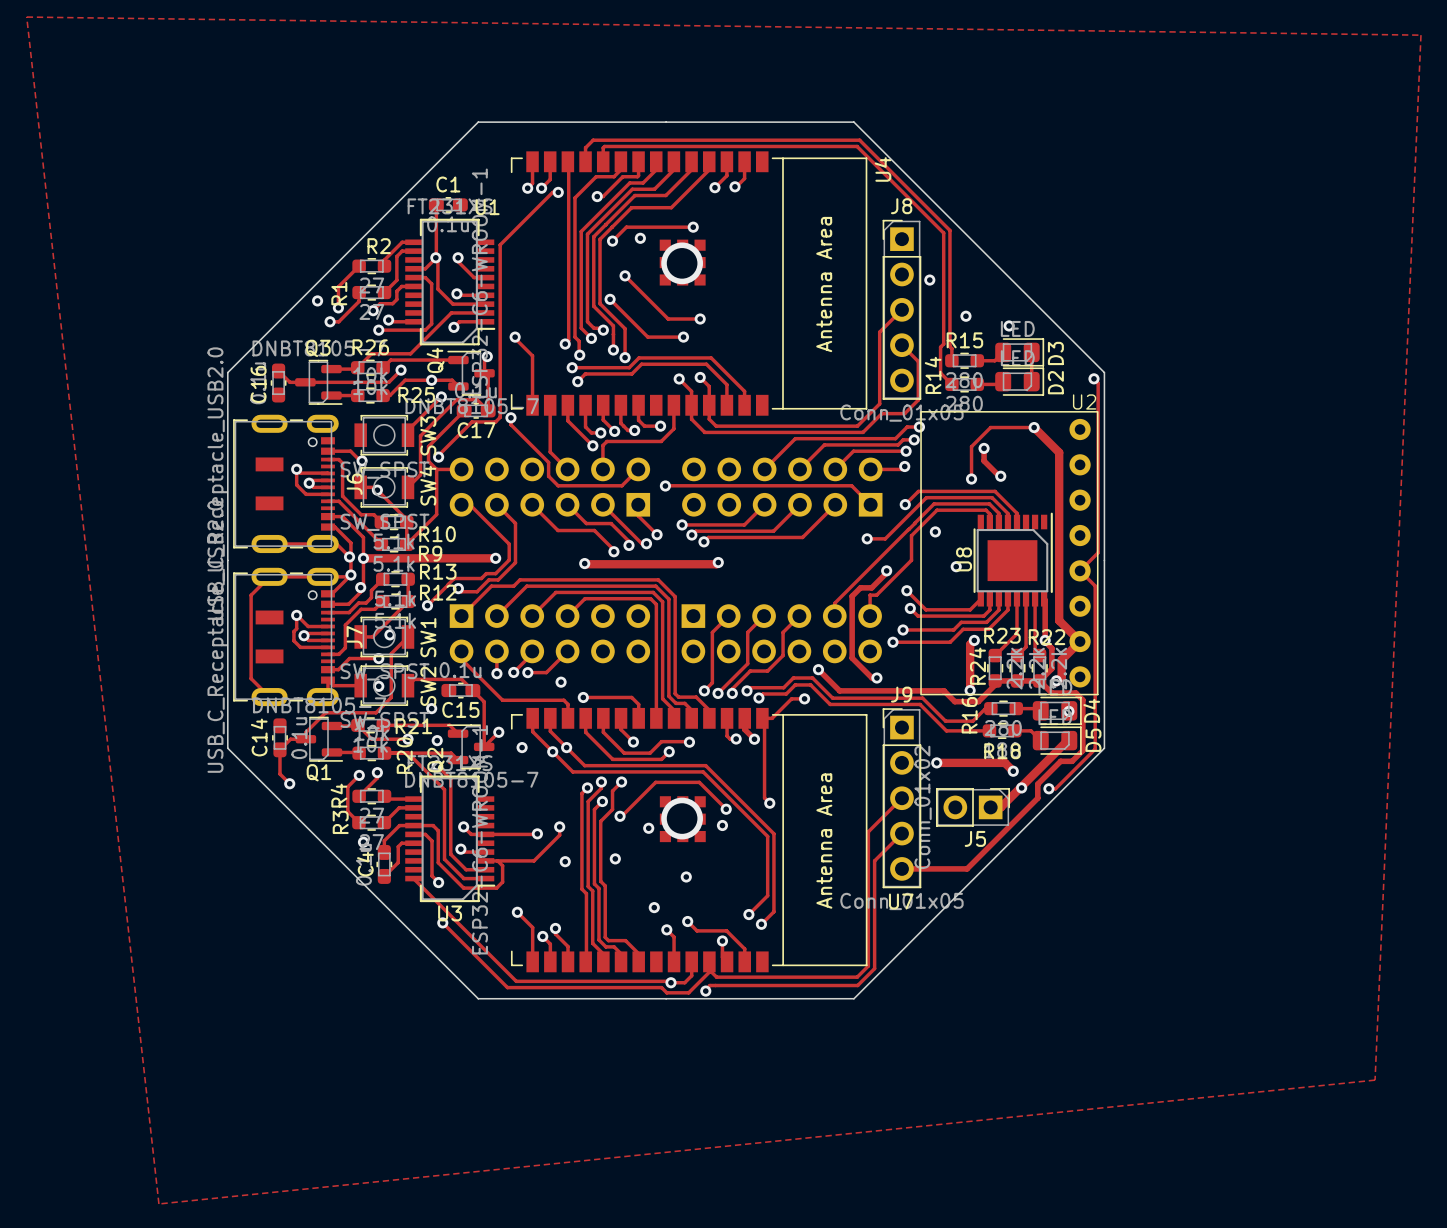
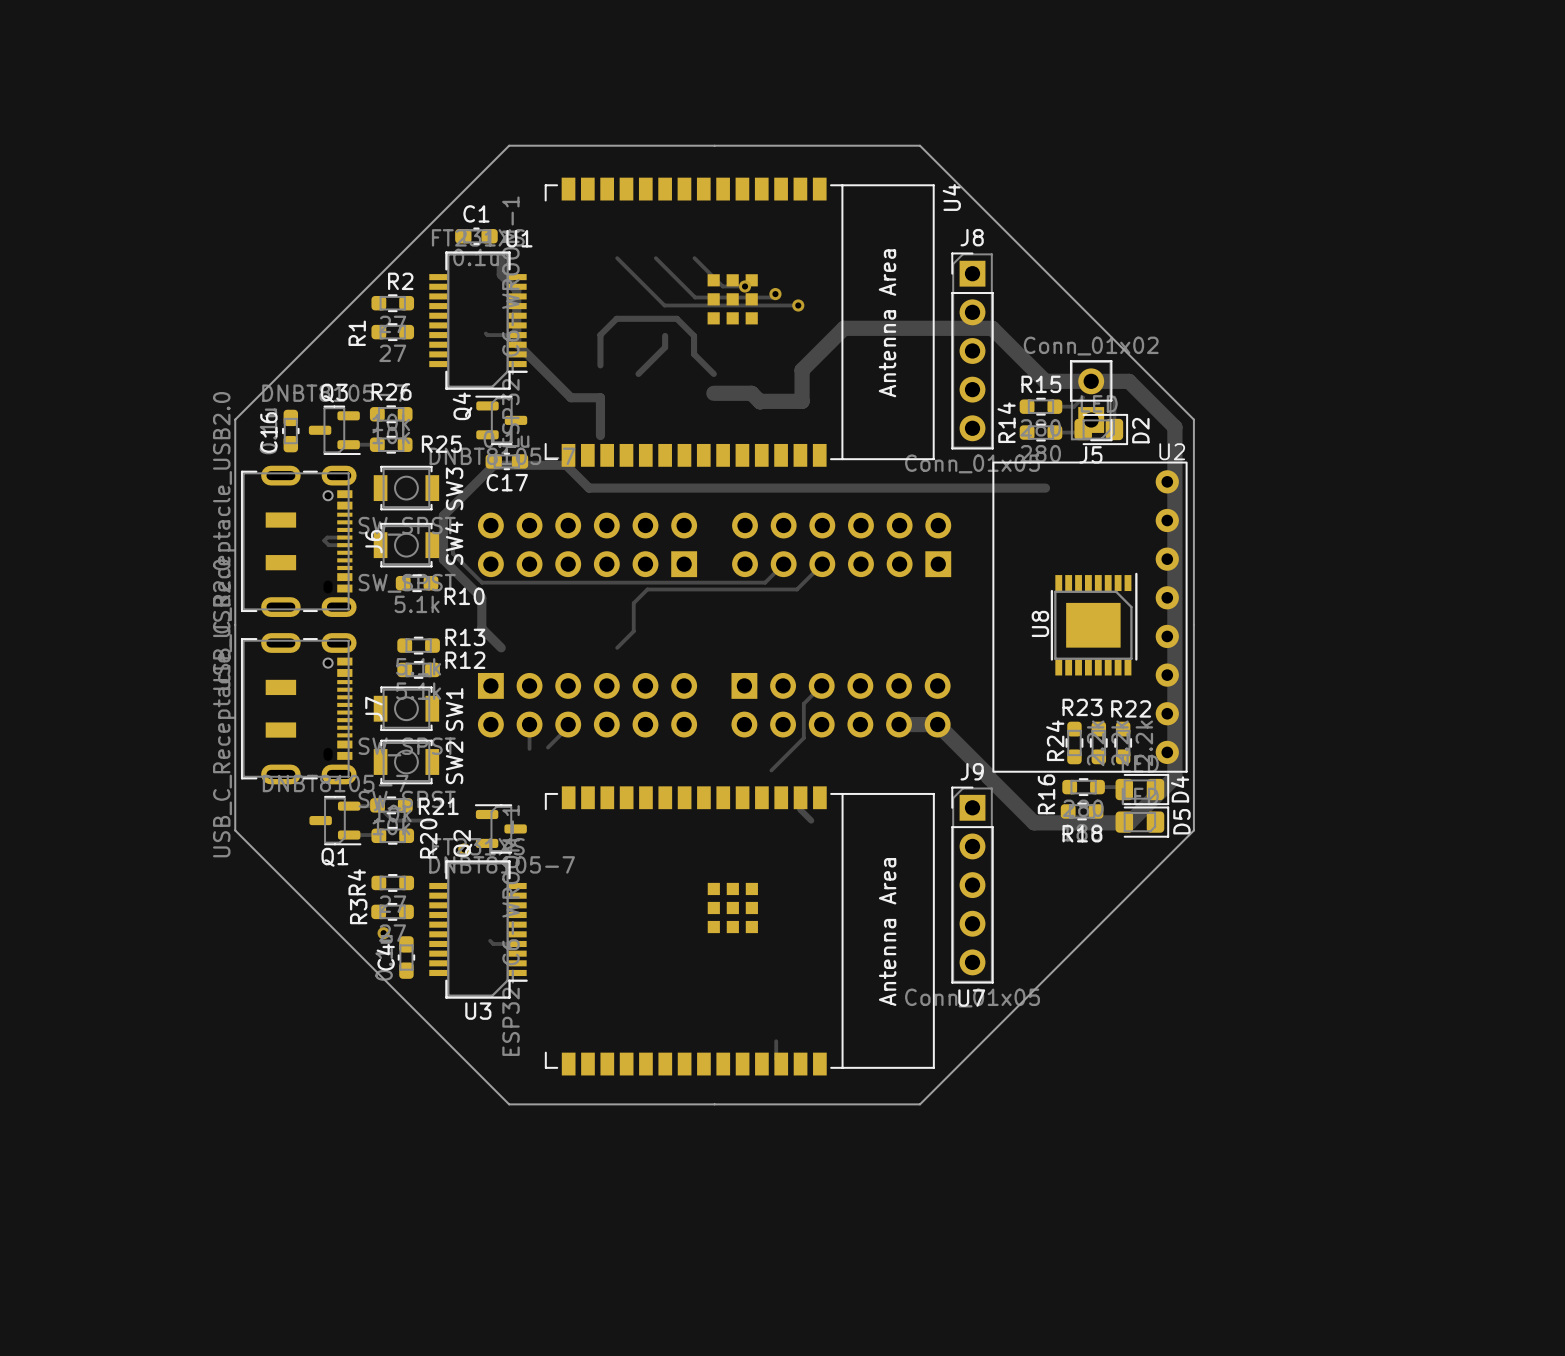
zone outline: (26, 17) (1420, 35) (1375, 1080) (158, 1203) (26, 17) -> none
track: (532, 161) (532, 183) (527, 188) -> none
track: (550, 161) (550, 179) (541, 188) -> none
track: (567, 161) (568, 340) (565, 344) -> none
track: (585, 161) (585, 147) (593, 140) (859, 140) (949, 230) (949, 346) (951, 348) (951, 360) -> none
track: (603, 161) (604, 146) (857, 146) (943, 233) (943, 344) (940, 347) (940, 373) (951, 384) -> none
track: (620, 161) (620, 169) (614, 176) (596, 176) (574, 197) (574, 337) (579, 341) (579, 355) -> none
track: (638, 161) (637, 176) (622, 176) (603, 196) (597, 196) -> none
track: (656, 161) (656, 169) (643, 183) (629, 183) (581, 231) (581, 328) (591, 338) -> none
track: (673, 161) (673, 169) (654, 189) (632, 189) (587, 234) (587, 321) (593, 328) (603, 330) -> none
track: (691, 161) (691, 169) (665, 195) (634, 195) (593, 236) (593, 306) (613, 325) (613, 350) -> none
track: (709, 161) (709, 169) (671, 207) (631, 207) (600, 239) (600, 303) (625, 328) (625, 357) -> none
track: (726, 161) (726, 175) (714, 187) -> none
track: (744, 161) (744, 178) (734, 188) (734, 186) (736, 186) -> none
via: (734, 186) -> none
via: (714, 187) -> none
via: (527, 188) -> none
via: (541, 188) -> none
track: (558, 192) (552, 192) (500, 244) (500, 417) (495, 421) (472, 421) (438, 457) -> none
via: (558, 192) -> none
via: (597, 196) -> none
track: (436, 204) (436, 257) -> none
track: none -> (501, 258) (501, 274) (516, 290) (516, 343) (570, 397) (600, 397) (600, 435)
track: none -> (617, 258) (664, 305) (798, 305)
track: none -> (655, 258) (695, 297) (772, 297) (775, 294)
track: none -> (694, 258) (722, 286) (745, 286)
track: (693, 227) (626, 227) (612, 241) -> none
via: (693, 227) -> none
via: (640, 238) -> none
via: (612, 241) -> none
track: (413, 242) (402, 242) (384, 259) (384, 266) -> none
via: none -> (745, 286)
track: (413, 251) (402, 251) (396, 256) (396, 280) (384, 292) -> none
via: (435, 257) -> none
track: (436, 257) (437, 289) (452, 304) (485, 304) -> none
track: (436, 257) (425, 268) (413, 268) -> none
track: (458, 257) (458, 261) (474, 277) (485, 277) -> none
via: (458, 257) -> none
via: none -> (775, 294)
via: (682, 263) -> none
track: (359, 266) (338, 286) (338, 307) -> none
via: none -> (798, 305)
track: (625, 275) (668, 319) (700, 319) -> none
via: (625, 275) -> none
track: (413, 277) (425, 277) (431, 283) (431, 323) (425, 330) (378, 330) -> none
via: (929, 280) -> none
track: (413, 286) (401, 286) (396, 291) (396, 299) (392, 303) (380, 303) (373, 310) -> none
track: (359, 292) (359, 301) (338, 321) (330, 321) -> none
via: (456, 293) -> none
track: none -> (665, 335) (665, 347) (638, 373)
track: (610, 299) (647, 337) (683, 337) -> none
via: (610, 299) -> none
via: (317, 300) -> none
via: (338, 307) -> none
track: (901, 309) (879, 332) (879, 403) (857, 426) (716, 426) (709, 419) (709, 386) (700, 377) -> none
via: (373, 310) -> none
track: (485, 312) (451, 312) (410, 353) (371, 353) (356, 369) (331, 369) -> none
via: (965, 316) -> none
via: (700, 319) -> none
track: (388, 320) (390, 321) (413, 321) -> none
via: (388, 320) -> none
via: (330, 321) -> none
track: (485, 321) (459, 321) (453, 327) -> none
track: none -> (600, 365) (600, 334) (616, 318) (676, 318) (694, 335) (694, 354) (713, 373)
via: (1009, 325) -> none
via: (453, 327) -> none
via: (378, 330) -> none
via: (603, 330) -> none
via: (515, 337) -> none
via: (683, 337) -> none
track: (515, 338) (513, 337) (532, 355) (532, 405) -> none
via: (591, 338) -> none
via: (565, 344) -> none
track: (901, 345) (918, 361) (918, 400) (904, 413) (881, 413) (863, 432) (704, 432) (691, 419) (691, 391) (679, 378) -> none
track: none -> (713, 393) (751, 393) (760, 401) (802, 401) (802, 370) (843, 328) (992, 328) (1045, 381) (1129, 381) (1174, 427) (1174, 777) (1129, 822) (1034, 822) (937, 724) (899, 724)
via: (613, 350) -> none
D3: LED (1019, 352) -> none
via: (579, 355) -> none
track: (487, 356) (484, 359) (484, 373) (488, 376) (488, 410) (477, 399) (456, 399) (420, 435) (420, 474) (408, 487) -> none
via: (487, 356) -> none
via: (625, 357) -> none
track: (458, 360) (390, 360) (383, 367) -> none
track: (572, 367) (629, 367) (638, 357) (711, 357) (744, 391) (744, 405) -> none
via: (572, 367) -> none
track: (401, 370) (388, 382) (289, 382) (278, 371) -> none
via: (401, 370) -> none
via: (700, 377) -> none
via: (679, 378) -> none
track: (1093, 378) (1098, 383) (1098, 552) (1080, 570) (1095, 585) (1095, 749) (1055, 788) (1048, 788) -> none
via: (1093, 378) -> none
via: (431, 380) -> none
track: (577, 381) (585, 373) (631, 373) (641, 364) (706, 364) (726, 384) (726, 405) -> none
via: (577, 381) -> none
track: (458, 386) (452, 380) (405, 380) (389, 395) (383, 395) -> none
track: (441, 396) (408, 430) (408, 435) -> none
via: (441, 396) -> none
track: (550, 405) (550, 452) (567, 469) -> none
track: (567, 405) (567, 420) (592, 445) -> none
track: (585, 405) (585, 426) (591, 432) (600, 432) -> none
track: (603, 405) (603, 419) (614, 431) -> none
track: (620, 405) (620, 423) (628, 430) (634, 430) -> none
track: (638, 405) (638, 420) (644, 426) (660, 426) -> none
track: (673, 405) (673, 428) (661, 441) (606, 441) (602, 445) (602, 469) -> none
track: (464, 410) (428, 446) (428, 461) (436, 469) -> none
track: (510, 417) (510, 424) (548, 462) (548, 476) (558, 485) (621, 485) (638, 469) -> none
via: (510, 417) -> none
via: (660, 426) -> none
track: (919, 426) (907, 426) (895, 438) (795, 438) (764, 469) -> none
via: (919, 426) -> none
via: (1034, 427) -> none
via: (634, 430) -> none
via: (614, 431) -> none
via: (600, 432) -> none
track: none -> (1045, 488) (589, 488) (566, 465) (493, 465) (443, 515) (443, 559) (481, 598) (481, 628) (501, 647)
track: (914, 439) (903, 439) (898, 444) (824, 444) (799, 469) -> none
via: (914, 439) -> none
via: (592, 445) -> none
track: (984, 448) (984, 460) (1000, 477) (1000, 476) (999, 476) -> none
via: (984, 448) -> none
track: (327, 451) (350, 451) (362, 460) -> none
track: (906, 451) (853, 451) (835, 469) -> none
via: (906, 451) -> none
via: (438, 457) -> none
track: (327, 459) (338, 459) (342, 463) (342, 496) (361, 514) (373, 514) (381, 522) -> none
via: (362, 460) -> none
track: (904, 466) (901, 469) (870, 469) -> none
via: (904, 466) -> none
via: (296, 469) -> none
track: (436, 469) (461, 469) -> none
track: (436, 469) (436, 514) (406, 544) (406, 519) (374, 487) (360, 487) -> none
track: (327, 473) (300, 473) (296, 469) (296, 484) (306, 494) (327, 494) -> none
via: (1000, 476) -> none
track: (971, 479) (971, 446) (990, 427) (1034, 427) (1059, 452) (1059, 620) (1080, 641) (1061, 659) (1061, 676) (1056, 682) (1057, 680) -> none
via: (971, 479) -> none
via: (309, 483) -> none
track: none -> (455, 541) (452, 544) (452, 553) (481, 582) (765, 582) (783, 564)
via: (665, 485) -> none
track: (666, 485) (665, 485) (665, 487) (667, 485) (851, 485) (870, 504) -> none
via: (377, 490) -> none
track: (327, 501) (338, 501) (381, 544) -> none
track: (461, 504) (469, 504) (509, 544) (509, 560) (495, 573) (486, 573) (481, 578) (454, 578) (427, 605) -> none
track: (496, 504) (515, 523) (515, 562) (498, 579) (488, 579) (477, 591) (461, 591) (458, 588) -> none
track: (532, 504) (558, 530) (594, 530) (613, 551) -> none
track: (567, 504) (586, 523) (611, 523) (629, 541) (629, 545) -> none
track: (602, 504) (641, 543) (646, 543) -> none
track: (799, 504) (773, 531) (695, 531) (691, 535) -> none
track: (835, 504) (802, 537) (708, 537) (703, 541) -> none
track: (905, 504) (918, 491) (995, 491) (1017, 513) (1017, 522) -> none
via: (905, 504) -> none
track: (638, 511) (638, 515) (657, 534) -> none
track: (327, 516) (342, 516) (363, 537) (363, 584) (360, 587) (360, 592) (348, 604) (327, 604) -> none
track: (989, 522) (989, 514) (986, 510) (937, 510) (911, 535) (911, 560) (876, 595) (870, 595) (870, 616) -> none
track: (998, 522) (998, 513) (989, 503) (934, 503) (834, 603) (834, 616) -> none
track: (1007, 522) (1007, 513) (992, 497) (926, 497) (885, 538) (867, 538) -> none
track: (682, 524) (744, 524) -> (617, 647) (633, 631) (633, 603) (647, 589) (797, 589) (800, 586)
via: (682, 524) -> none
track: (327, 527) (334, 527) (350, 543) (349, 556) -> none
via: (935, 531) -> none
via: (657, 534) -> none
via: (691, 535) -> none
via: (867, 538) -> none
via: (703, 541) -> none
via: (646, 543) -> none
track: (269, 544) (336, 544) (350, 558) (350, 575) (332, 593) (327, 593) -> none
R9: 5.1k (394, 544) -> none
via: (629, 545) -> none
via: (613, 551) -> none
via: (349, 556) -> none
track: (363, 558) (495, 558) -> none
via: (363, 558) -> none
via: (495, 558) -> none
track: (718, 562) (716, 564) (584, 563) -> none
via: (718, 562) -> none
via: (584, 563) -> none
via: (956, 566) -> none
track: (886, 570) (871, 587) (860, 587) (852, 596) (852, 658) (872, 678) (876, 678) -> none
via: (886, 570) -> none
via: (350, 575) -> none
track: (349, 576) (269, 576) (251, 595) (251, 678) (269, 697) -> none
track: (382, 579) (371, 590) (371, 597) (366, 603) (358, 603) (349, 612) (327, 612) -> none
track: (408, 579) (408, 601) (372, 636) (360, 636) -> none
via: (360, 587) -> none
via: (458, 588) -> none
track: (906, 590) (925, 609) (970, 609) (980, 599) -> none
via: (906, 590) -> none
track: (989, 599) (989, 610) (983, 616) (917, 616) (910, 608) -> none
track: (998, 599) (998, 610) (986, 622) (961, 622) (953, 629) (903, 629) -> none
track: (1007, 599) (1007, 610) (988, 629) (963, 629) (950, 642) (892, 642) -> none
track: (1017, 599) (1017, 633) (995, 655) -> none
track: (1026, 599) (1026, 646) (1017, 655) -> none
track: (1035, 599) (1035, 650) (1039, 655) -> none
track: (1044, 599) (1045, 641) (1051, 648) (1051, 668) (1039, 680) -> none
track: (382, 601) (374, 609) (361, 609) (345, 625) (345, 647) (338, 654) (327, 654) -> none
via: (427, 605) -> none
via: (910, 608) -> none
track: (468, 609) (491, 586) (513, 586) (520, 579) (658, 579) (675, 596) (675, 693) (678, 697) (696, 697) (709, 710) (709, 718) -> none
track: (503, 609) (526, 586) (655, 586) (668, 599) (668, 696) (676, 703) (684, 703) (691, 710) (691, 718) -> none
track: (539, 609) (555, 592) (653, 592) (662, 601) (662, 698) (674, 710) (674, 718) -> none
track: (574, 609) (584, 598) (650, 598) (656, 604) (656, 718) -> none
via: (296, 615) -> none
track: (728, 616) (712, 632) (712, 682) (704, 690) -> none
track: (799, 616) (783, 632) (783, 655) (767, 671) (750, 671) (732, 689) (732, 693) -> none
track: (327, 626) (308, 626) (296, 615) (296, 628) (293, 631) (293, 640) (300, 647) (327, 647) -> none
via: (903, 629) -> none
track: (327, 633) (306, 633) (304, 635) (308, 640) (327, 640) -> none
via: (389, 634) -> none
via: (304, 635) -> none
track: (408, 636) (391, 653) (391, 697) (375, 712) (325, 712) (305, 732) (305, 739) (290, 739) (279, 749) (279, 774) (289, 783) -> none
track: (974, 640) (970, 644) (970, 690) -> none
via: (974, 640) -> none
via: (1045, 640) -> none
via: (892, 642) -> none
track: (461, 651) (461, 659) (502, 700) (563, 700) (568, 704) (568, 718) -> none
track: (567, 651) (546, 672) (527, 672) -> none
track: (378, 658) (349, 658) (338, 669) (327, 669) -> none
via: (378, 658) -> none
track: (818, 669) (839, 690) (944, 690) (954, 701) (978, 701) (995, 684) (995, 680) (1039, 680) -> none
via: (818, 669) -> none
via: (513, 672) -> none
via: (527, 672) -> none
via: (496, 673) -> none
via: (876, 678) -> none
track: (1039, 680) (1051, 693) (1075, 693) (1082, 700) (1082, 750) (1072, 761) (1060, 761) (1037, 784) (1037, 798) (967, 868) (901, 868) -> none
via: (1056, 680) -> none
via: (561, 682) -> none
track: (360, 685) (333, 685) (327, 680) (327, 691) (322, 697) -> none
track: (408, 685) (414, 679) (461, 679) (484, 701) (484, 746) (498, 732) -> none
via: (378, 686) -> none
C15: 0.1u (460, 690) -> none
via: (704, 690) -> none
track: (746, 690) (750, 687) (783, 687) (793, 678) (812, 678) (832, 698) (922, 698) (945, 721) (972, 721) (985, 708) (990, 708) -> none
via: (746, 690) -> none
via: (970, 690) -> none
via: (718, 693) -> none
via: (732, 693) -> none
track: (583, 697) (631, 697) (638, 704) (638, 718) -> none
via: (583, 697) -> none
track: (758, 697) (762, 694) (786, 694) (795, 684) (810, 684) (830, 704) (920, 704) (946, 730) (989, 730) -> none
via: (758, 697) -> none
track: (804, 698) (791, 698) (772, 718) (762, 718) (764, 720) (764, 798) (769, 803) -> none
via: (804, 698) -> none
via: (431, 708) -> none
via: (1068, 711) -> none
track: (532, 718) (532, 731) (572, 771) (703, 771) (767, 836) (767, 895) (748, 914) -> none
track: (550, 718) (550, 731) (584, 765) (705, 765) (773, 833) (773, 911) (761, 924) -> none
track: (585, 718) (585, 732) (612, 759) (661, 759) (669, 751) -> none
track: (603, 718) (603, 732) (624, 753) (650, 753) (661, 741) (689, 742) -> none
track: (621, 718) (621, 729) (633, 742) -> none
track: (727, 718) (727, 736) (730, 739) (736, 739) -> none
track: (383, 725) (449, 725) (458, 733) -> none
track: (1014, 730) (1031, 730) (1040, 740) -> none
via: (498, 732) -> none
C14: 0.1u (279, 737) -> none
via: (408, 739) -> none
via: (736, 739) -> none
via: (754, 739) -> none
via: (437, 740) -> none
track: (1069, 740) (1000, 807) (990, 807) -> none
via: (633, 742) -> none
via: (689, 742) -> none
via: (522, 747) -> none
via: (566, 747) -> none
via: (552, 751) -> none
via: (669, 751) -> none
track: (384, 753) (451, 753) (458, 760) -> none
track: (408, 753) (444, 789) (444, 859) (463, 878) (485, 878) -> none
track: (936, 762) (1004, 762) (1013, 771) -> none
via: (936, 762) -> none
track: (437, 765) (450, 779) (450, 854) (466, 869) (485, 869) -> none
via: (1013, 771) -> none
track: (377, 772) (377, 778) (359, 796) -> none
via: (377, 772) -> none
track: (359, 775) (347, 786) (347, 811) (358, 822) -> none
via: (359, 775) -> none
track: (601, 782) (601, 788) (588, 801) (588, 886) (592, 891) (592, 943) (603, 954) (603, 961) -> none
via: (601, 782) -> none
track: (621, 782) (612, 791) (612, 809) (600, 821) (600, 881) (605, 885) (605, 937) (608, 940) (625, 940) (638, 953) (638, 961) -> none
via: (621, 782) -> none
via: (289, 783) -> none
track: (587, 787) (581, 793) (581, 889) (586, 893) (585, 961) -> none
via: (587, 787) -> none
via: (1021, 787) -> none
via: (1048, 788) -> none
track: (384, 796) (387, 799) (413, 799) -> none
track: (901, 798) (868, 831) (868, 966) (857, 977) (716, 977) (709, 969) -> none
track: (602, 801) (594, 809) (594, 883) (598, 888) (598, 939) (605, 946) (614, 946) (621, 953) (621, 961) -> none
via: (602, 801) -> none
via: (769, 803) -> none
track: (413, 807) (399, 807) (384, 822) -> none
J5 rotation: 0° (972, 807) -> 90° clockwise (1091, 400)
J5 position: (972, 807) -> (1091, 400)
track: (726, 809) (699, 782) (655, 782) (620, 816) -> none
via: (726, 809) -> none
via: (620, 816) -> none
via: (682, 818) -> none
via: (722, 825) -> none
track: (463, 826) (471, 834) (537, 833) -> none
via: (463, 826) -> none
track: (559, 826) (559, 835) (533, 860) (485, 860) -> none
via: (559, 826) -> none
via: (648, 828) -> none
via: (537, 833) -> none
track: (901, 833) (874, 860) (874, 968) (857, 985) (709, 985) (704, 991) (705, 989) -> none
track: (413, 834) (425, 834) (432, 841) (432, 875) (438, 882) -> none
track: (413, 843) (401, 843) (398, 846) (398, 862) (384, 876) -> none
via: (460, 849) -> none
track: (384, 852) (384, 840) (399, 825) (433, 825) (438, 830) (438, 862) (463, 888) (496, 888) (502, 882) (502, 865) (497, 860) -> none
via: (615, 858) -> none
via: (565, 861) -> none
via: (686, 876) -> none
track: (413, 878) (516, 981) (684, 982) (691, 975) (691, 961) -> none
via: (438, 882) -> none
via: (654, 907) -> none
track: (517, 912) (532, 927) (532, 961) -> none
via: (517, 912) -> none
via: (748, 914) -> none
track: (687, 921) (697, 930) (726, 930) (744, 948) (744, 961) -> none
via: (687, 921) -> none
track: (442, 922) (507, 987) (661, 987) (666, 992) (688, 992) (709, 972) (709, 961) -> none
via: (442, 922) -> none
via: (761, 924) -> none
track: (555, 928) (555, 934) (568, 946) (568, 961) -> none
via: (555, 928) -> none
track: (666, 929) (674, 937) (674, 961) -> none
via: (666, 929) -> none
track: (542, 936) (550, 944) (550, 961) -> none
via: (542, 936) -> none
via: (722, 940) -> none
via: (670, 982) -> none
via: (705, 991) -> none

